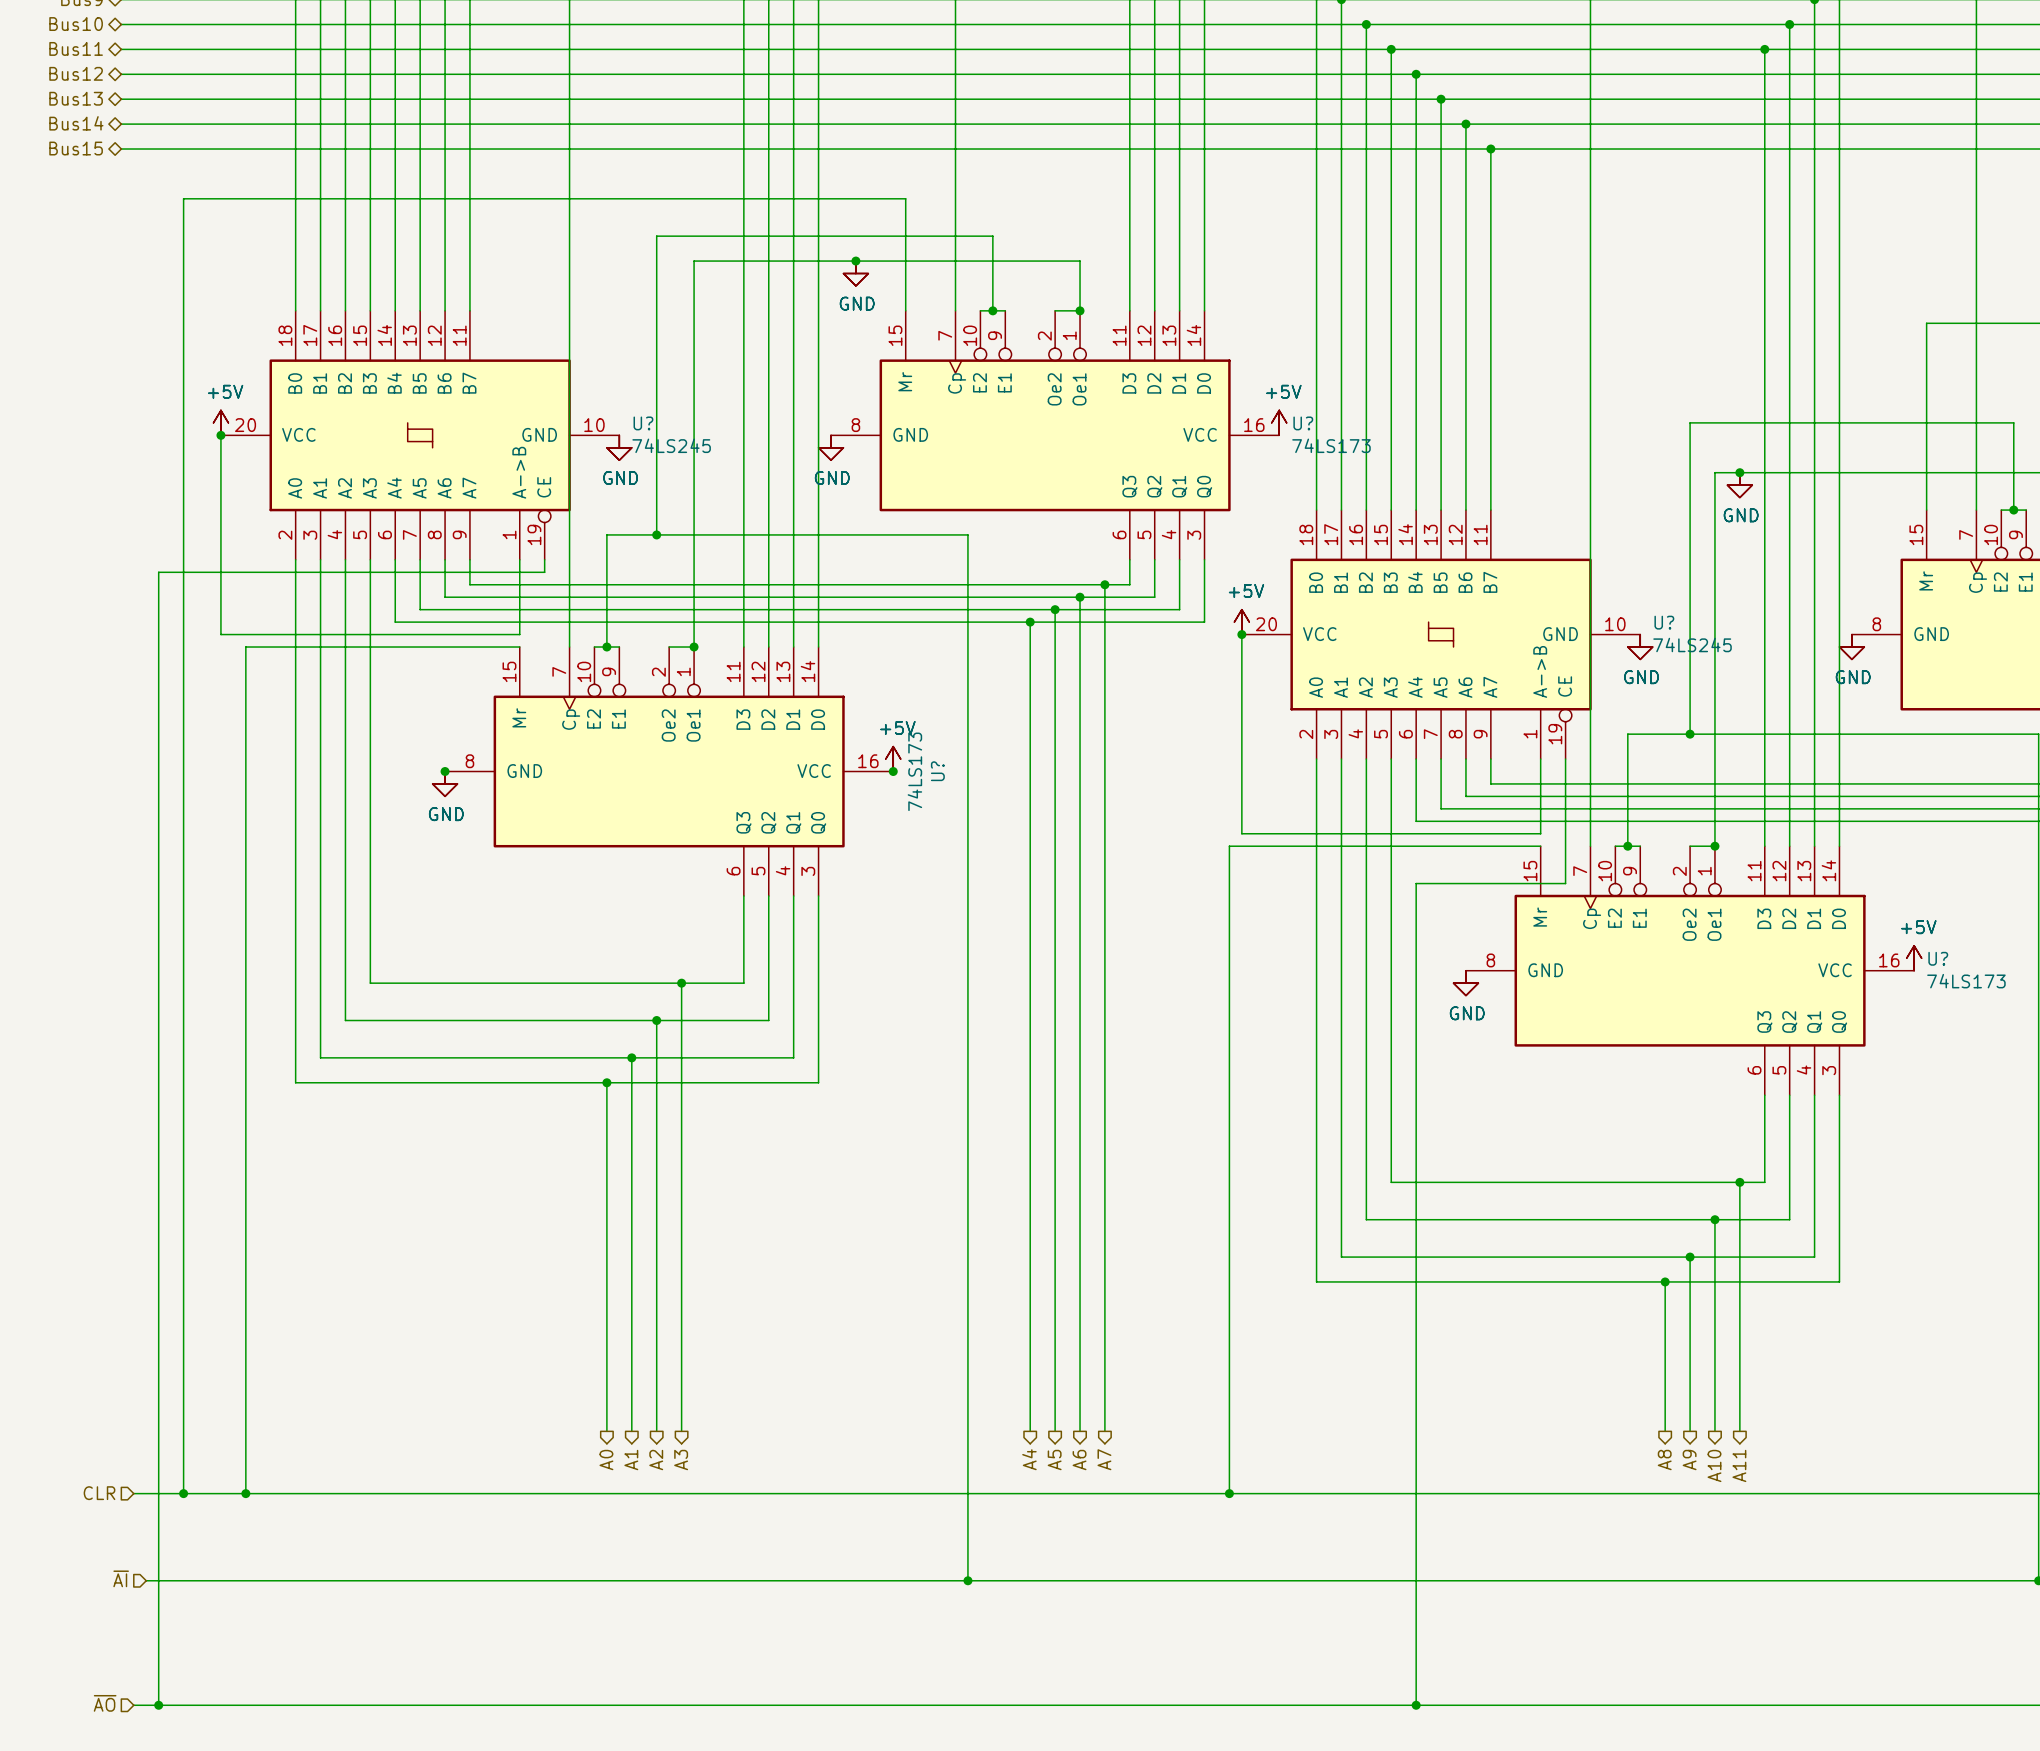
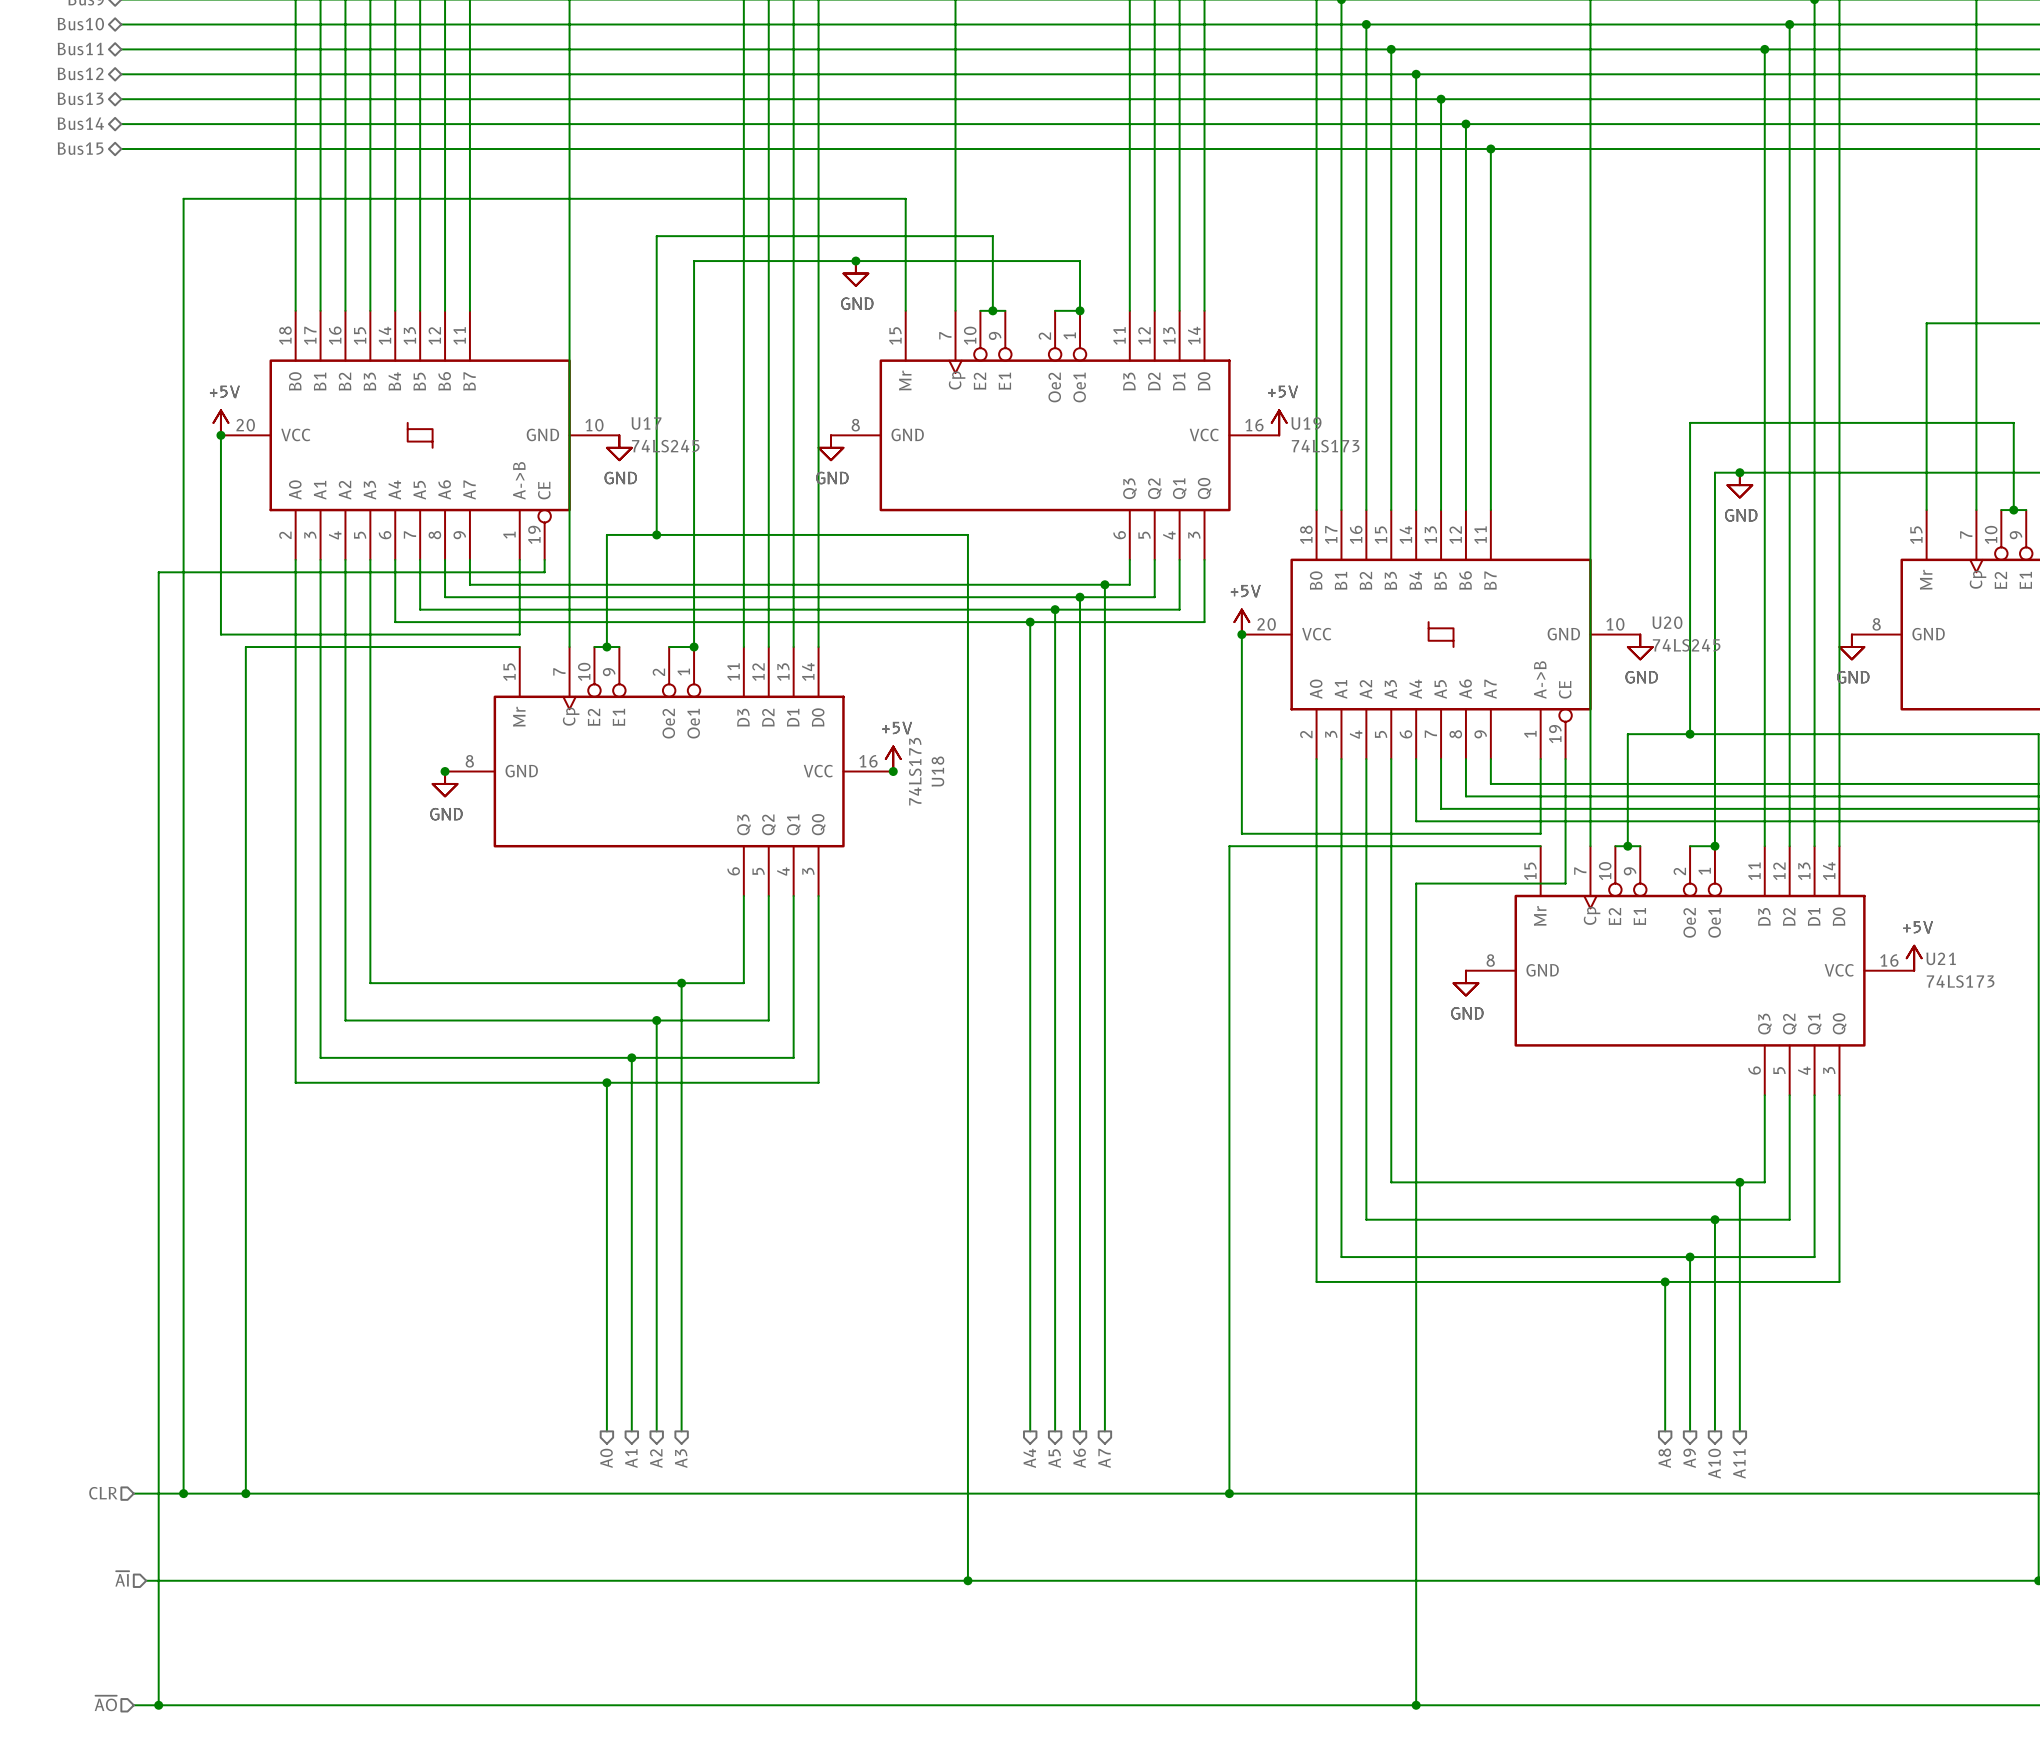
U? name: U? (643, 423) -> U17 (646, 423)
U? name: U? (1303, 423) -> U19 (1306, 423)
U? name: U? (1664, 622) -> U20 (1667, 622)
U? name: U? (937, 771) -> U18 (937, 771)
U? name: U? (1938, 958) -> U21 (1941, 958)

